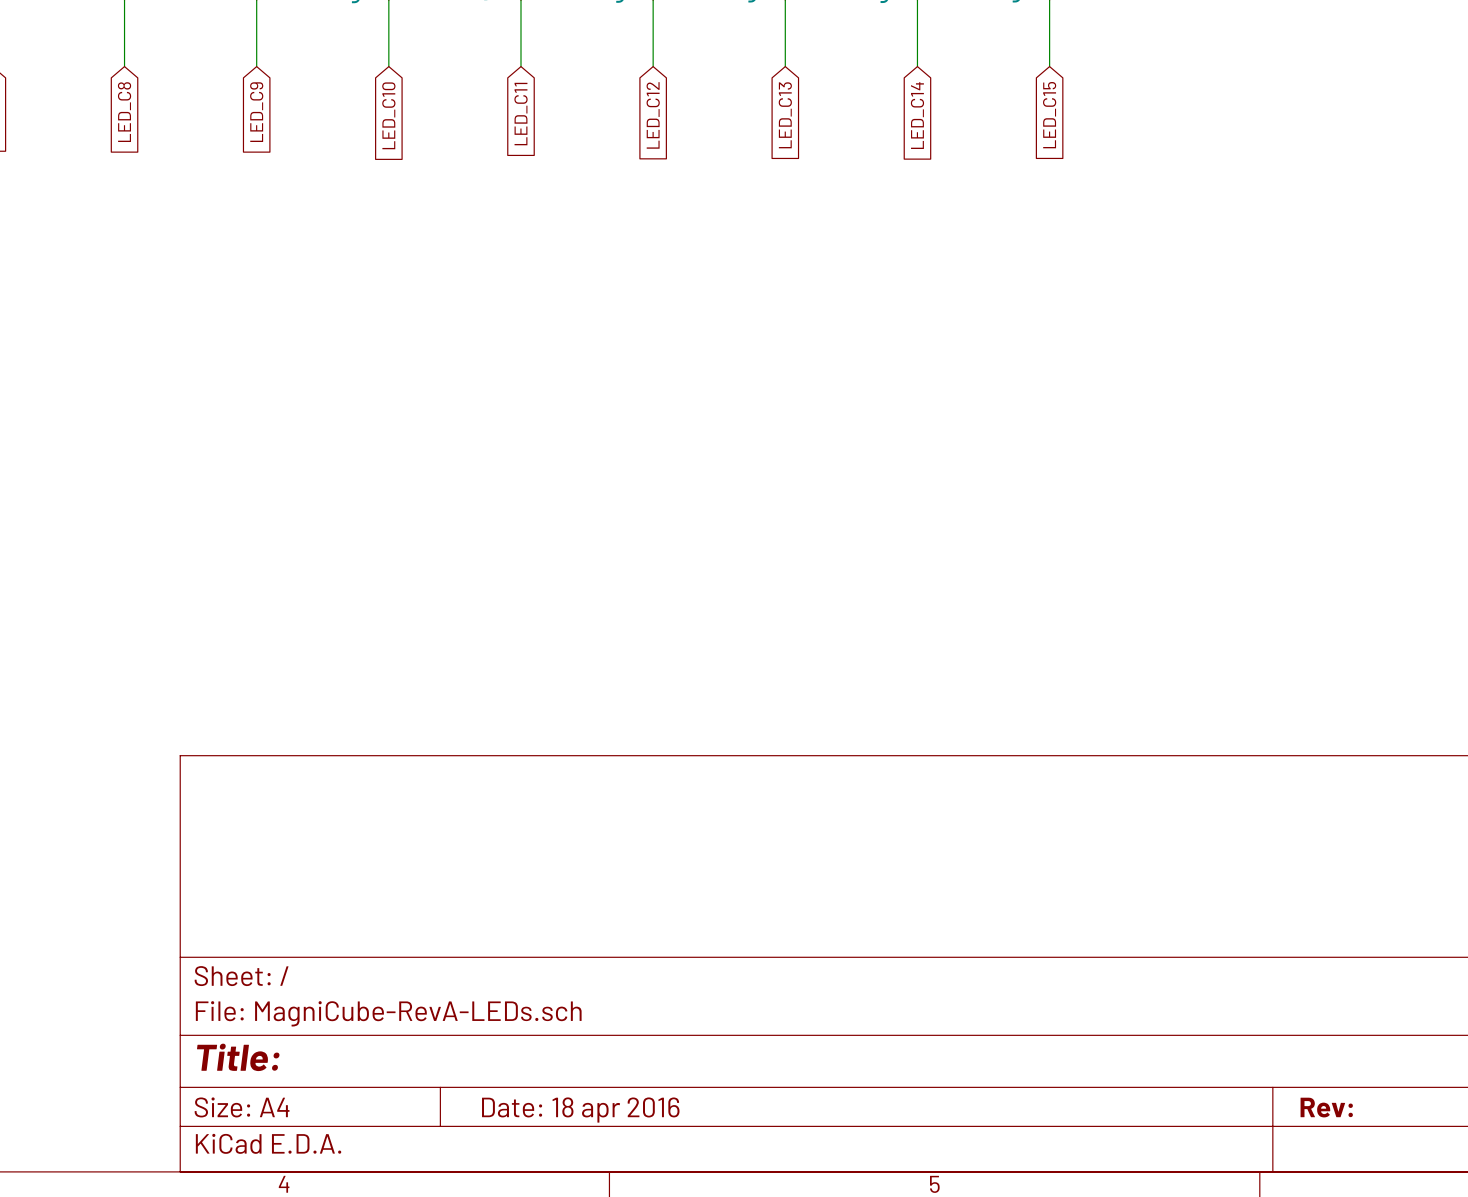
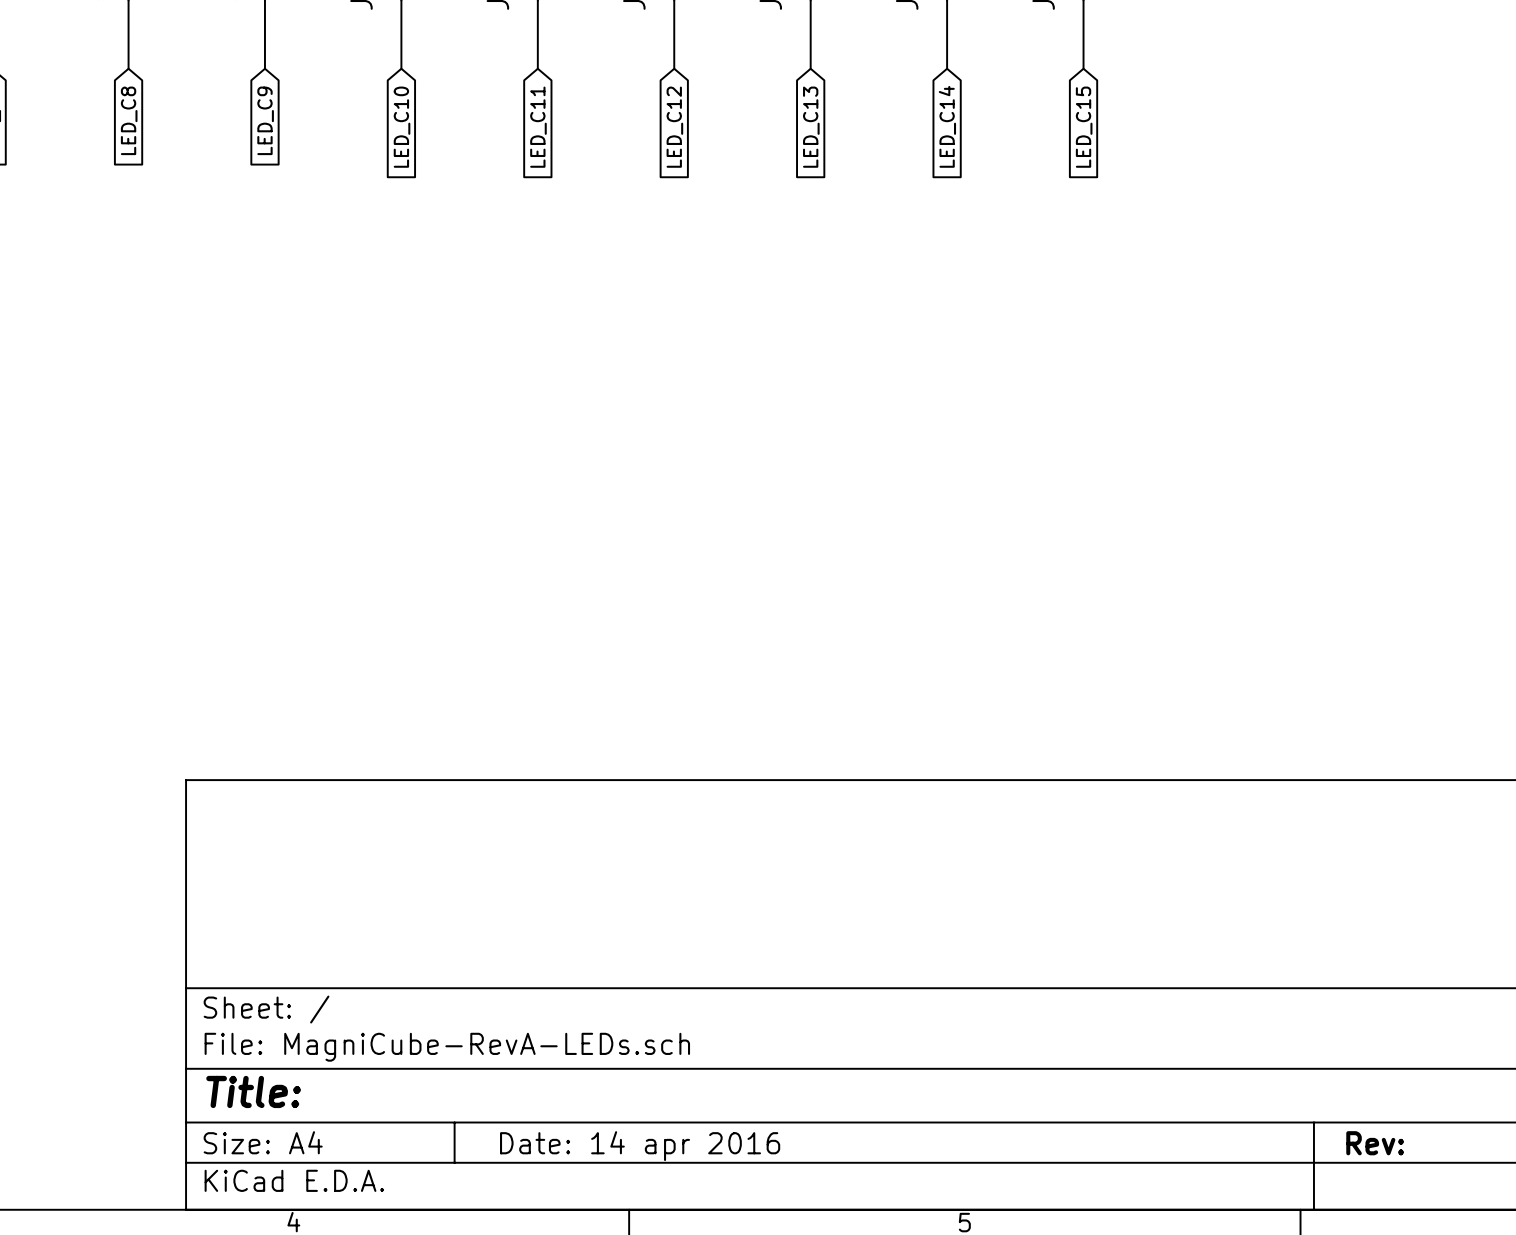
title block: Date: 18 apr 2016 (580, 1110) -> Date: 14 apr 2016 (640, 1146)

